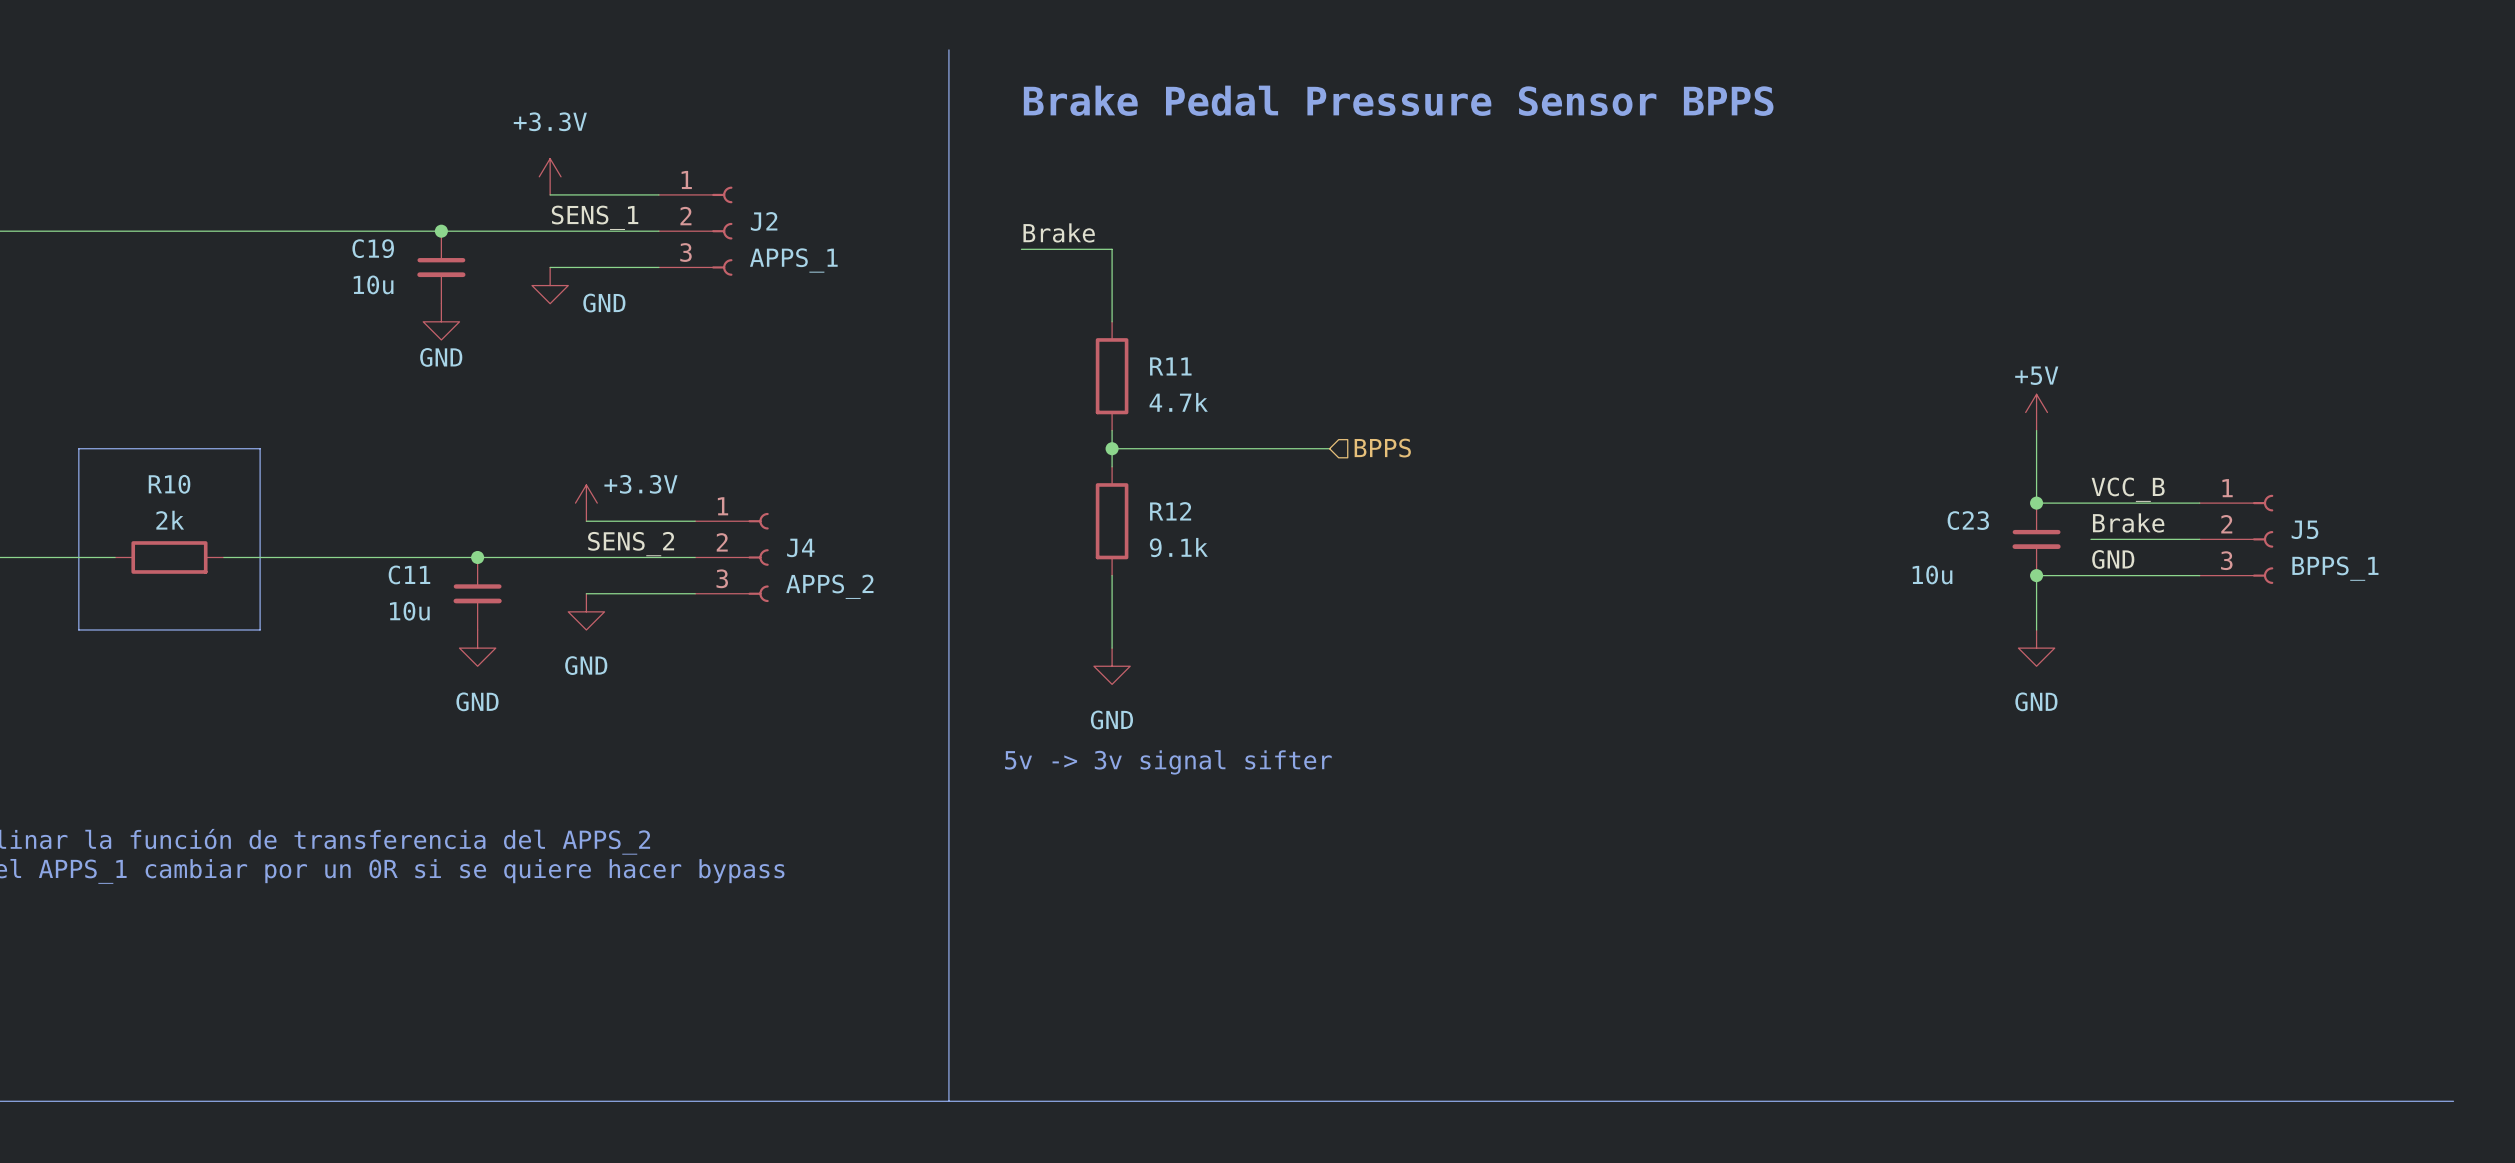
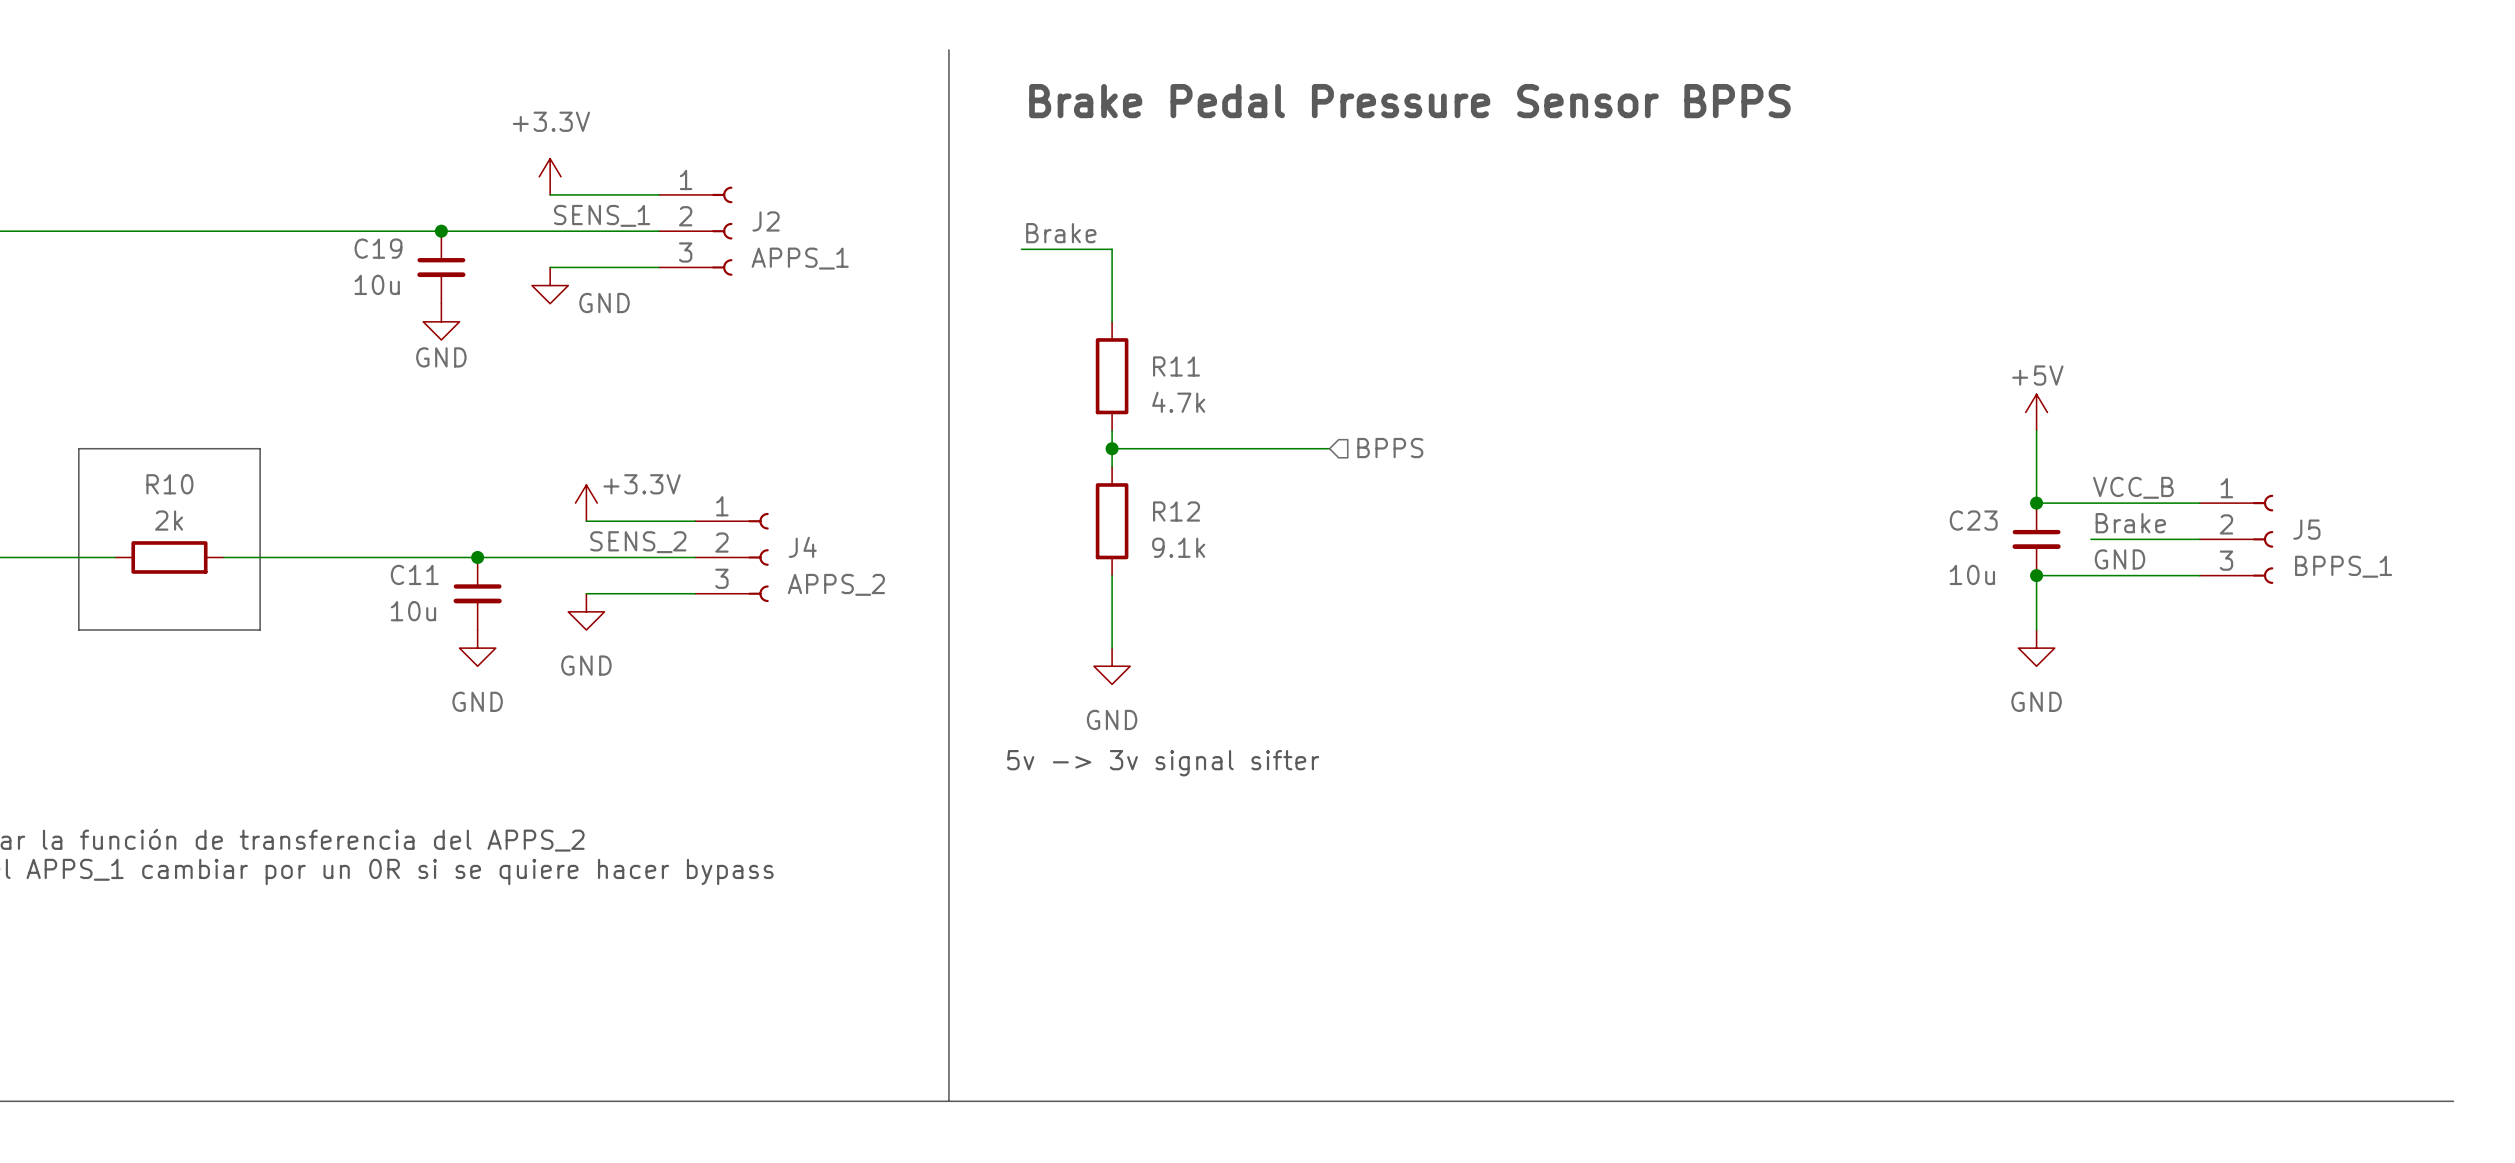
C23 value position: 10u (1932, 574) -> 10u (1972, 574)

